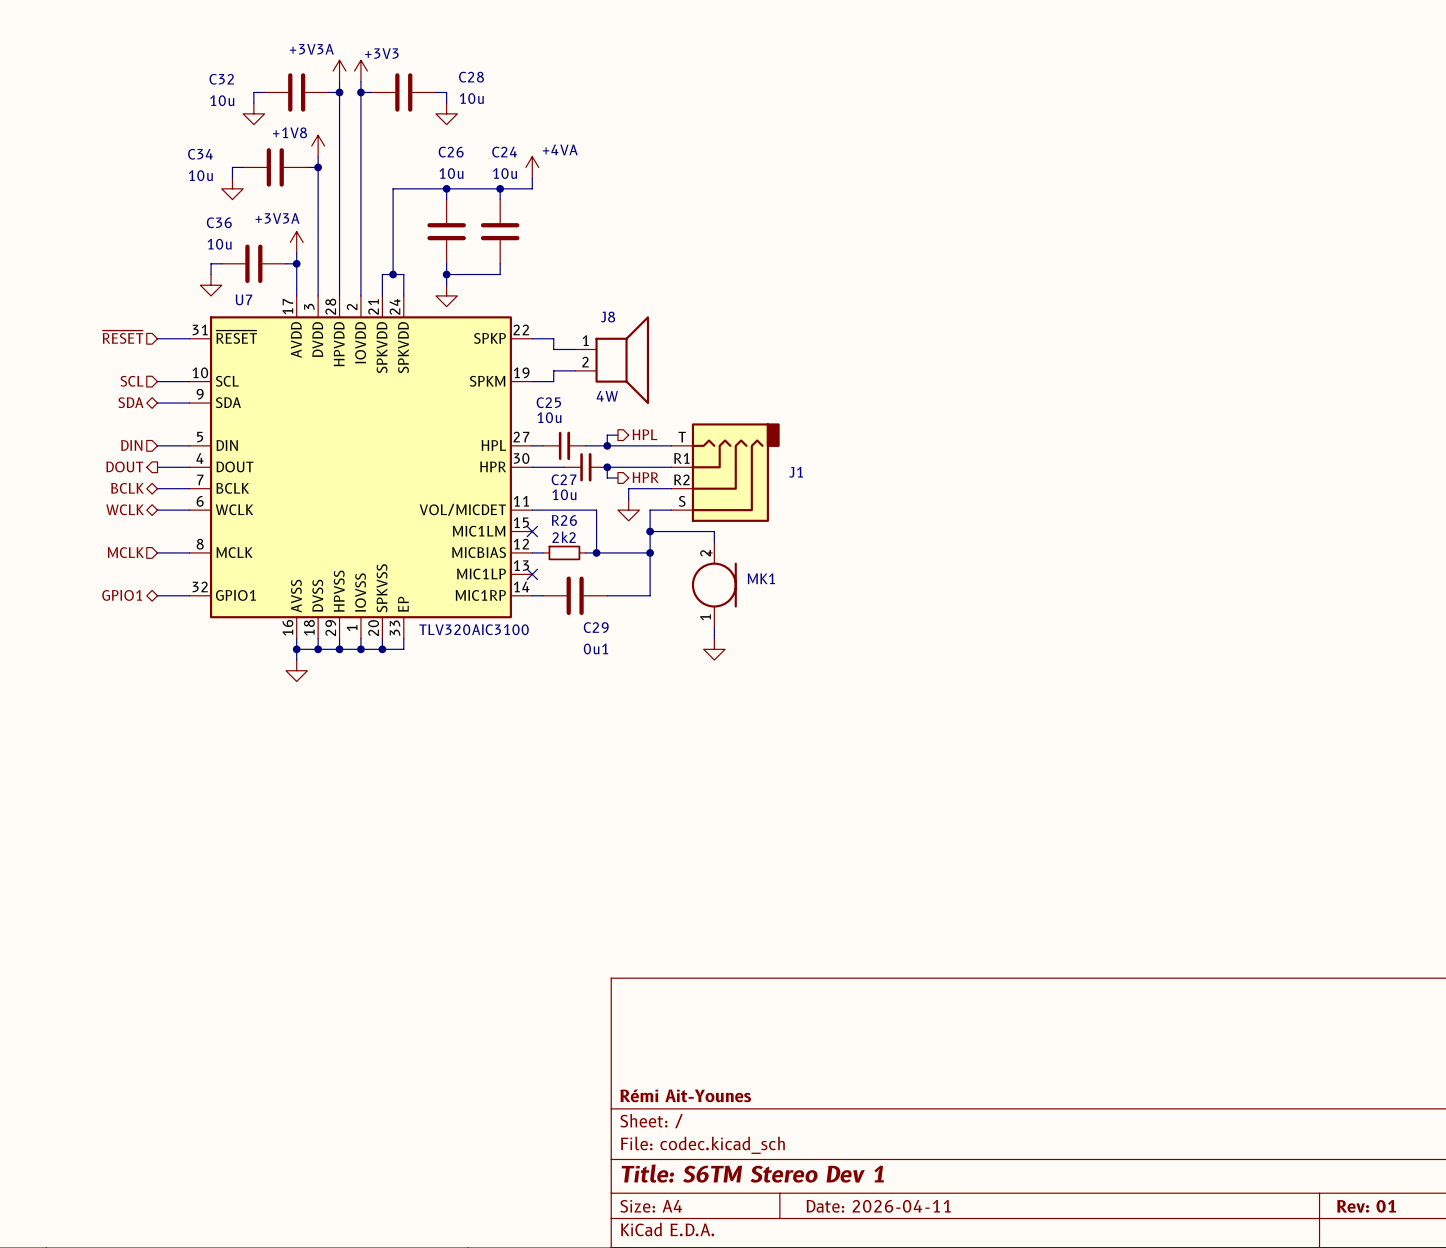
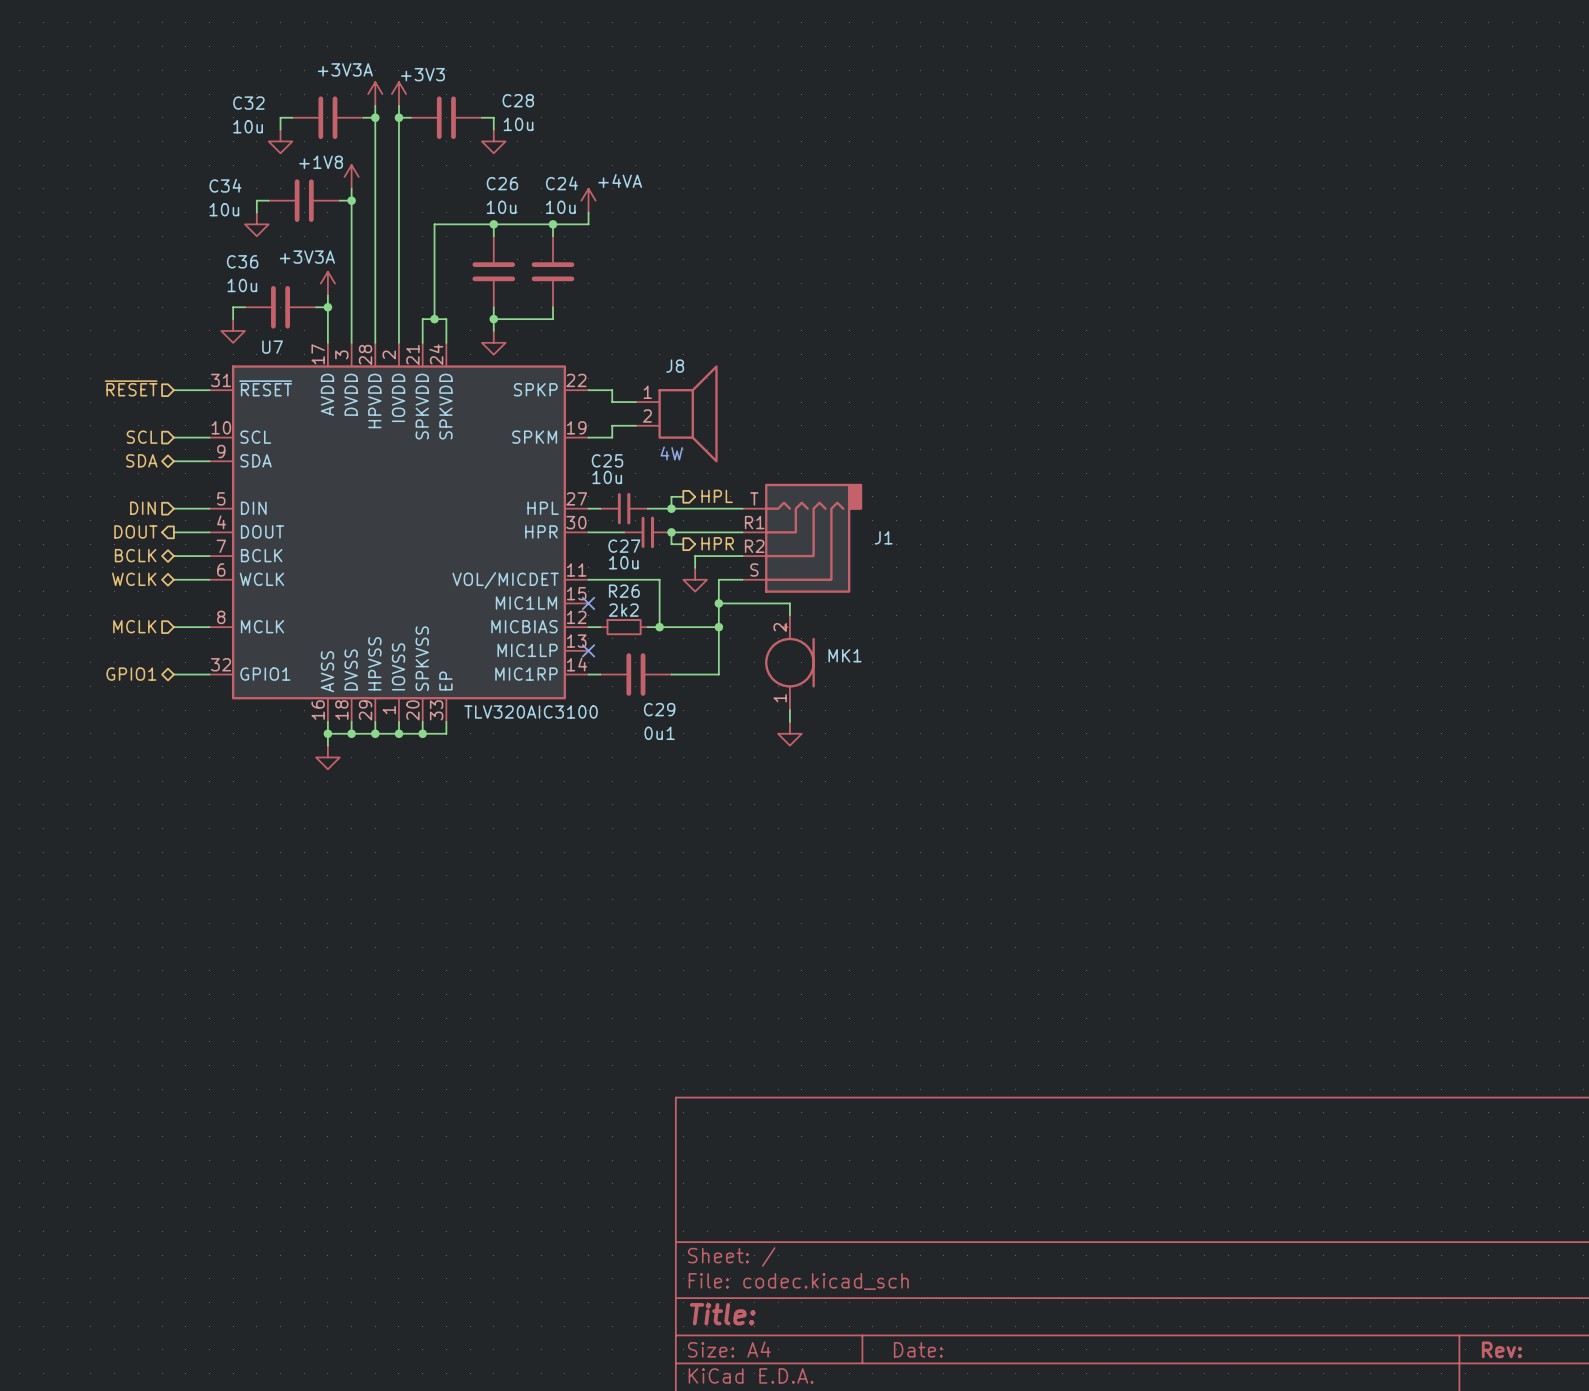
title block: Rémi Ait-Younes (685, 1095) -> none
title block: Title: S6TM Stereo Dev 1 (752, 1173) -> Title: (722, 1314)
title block: Date: 2026-04-11 (878, 1206) -> Date: (918, 1349)
title block: Rev: 01 (1366, 1206) -> Rev: (1501, 1349)

